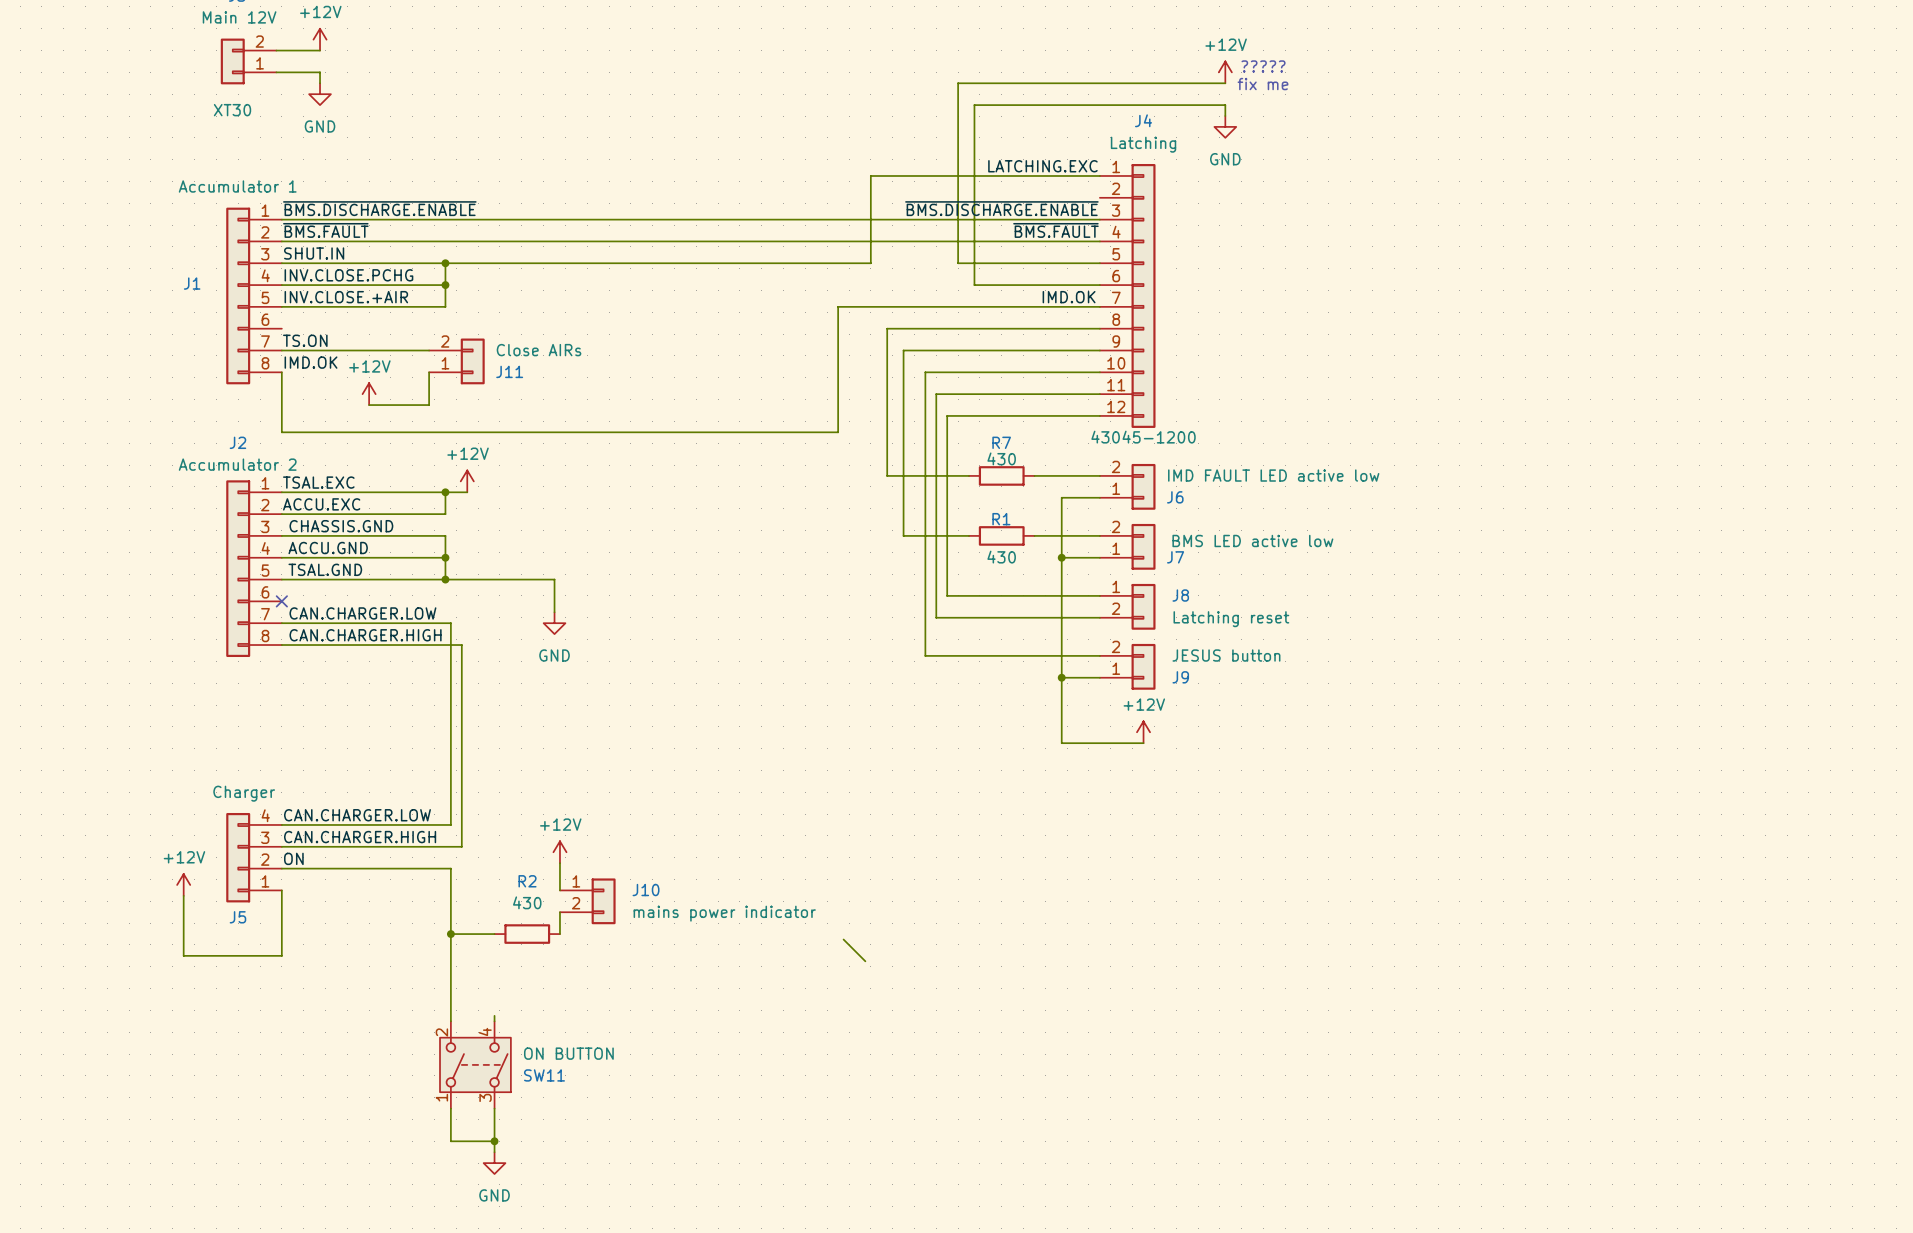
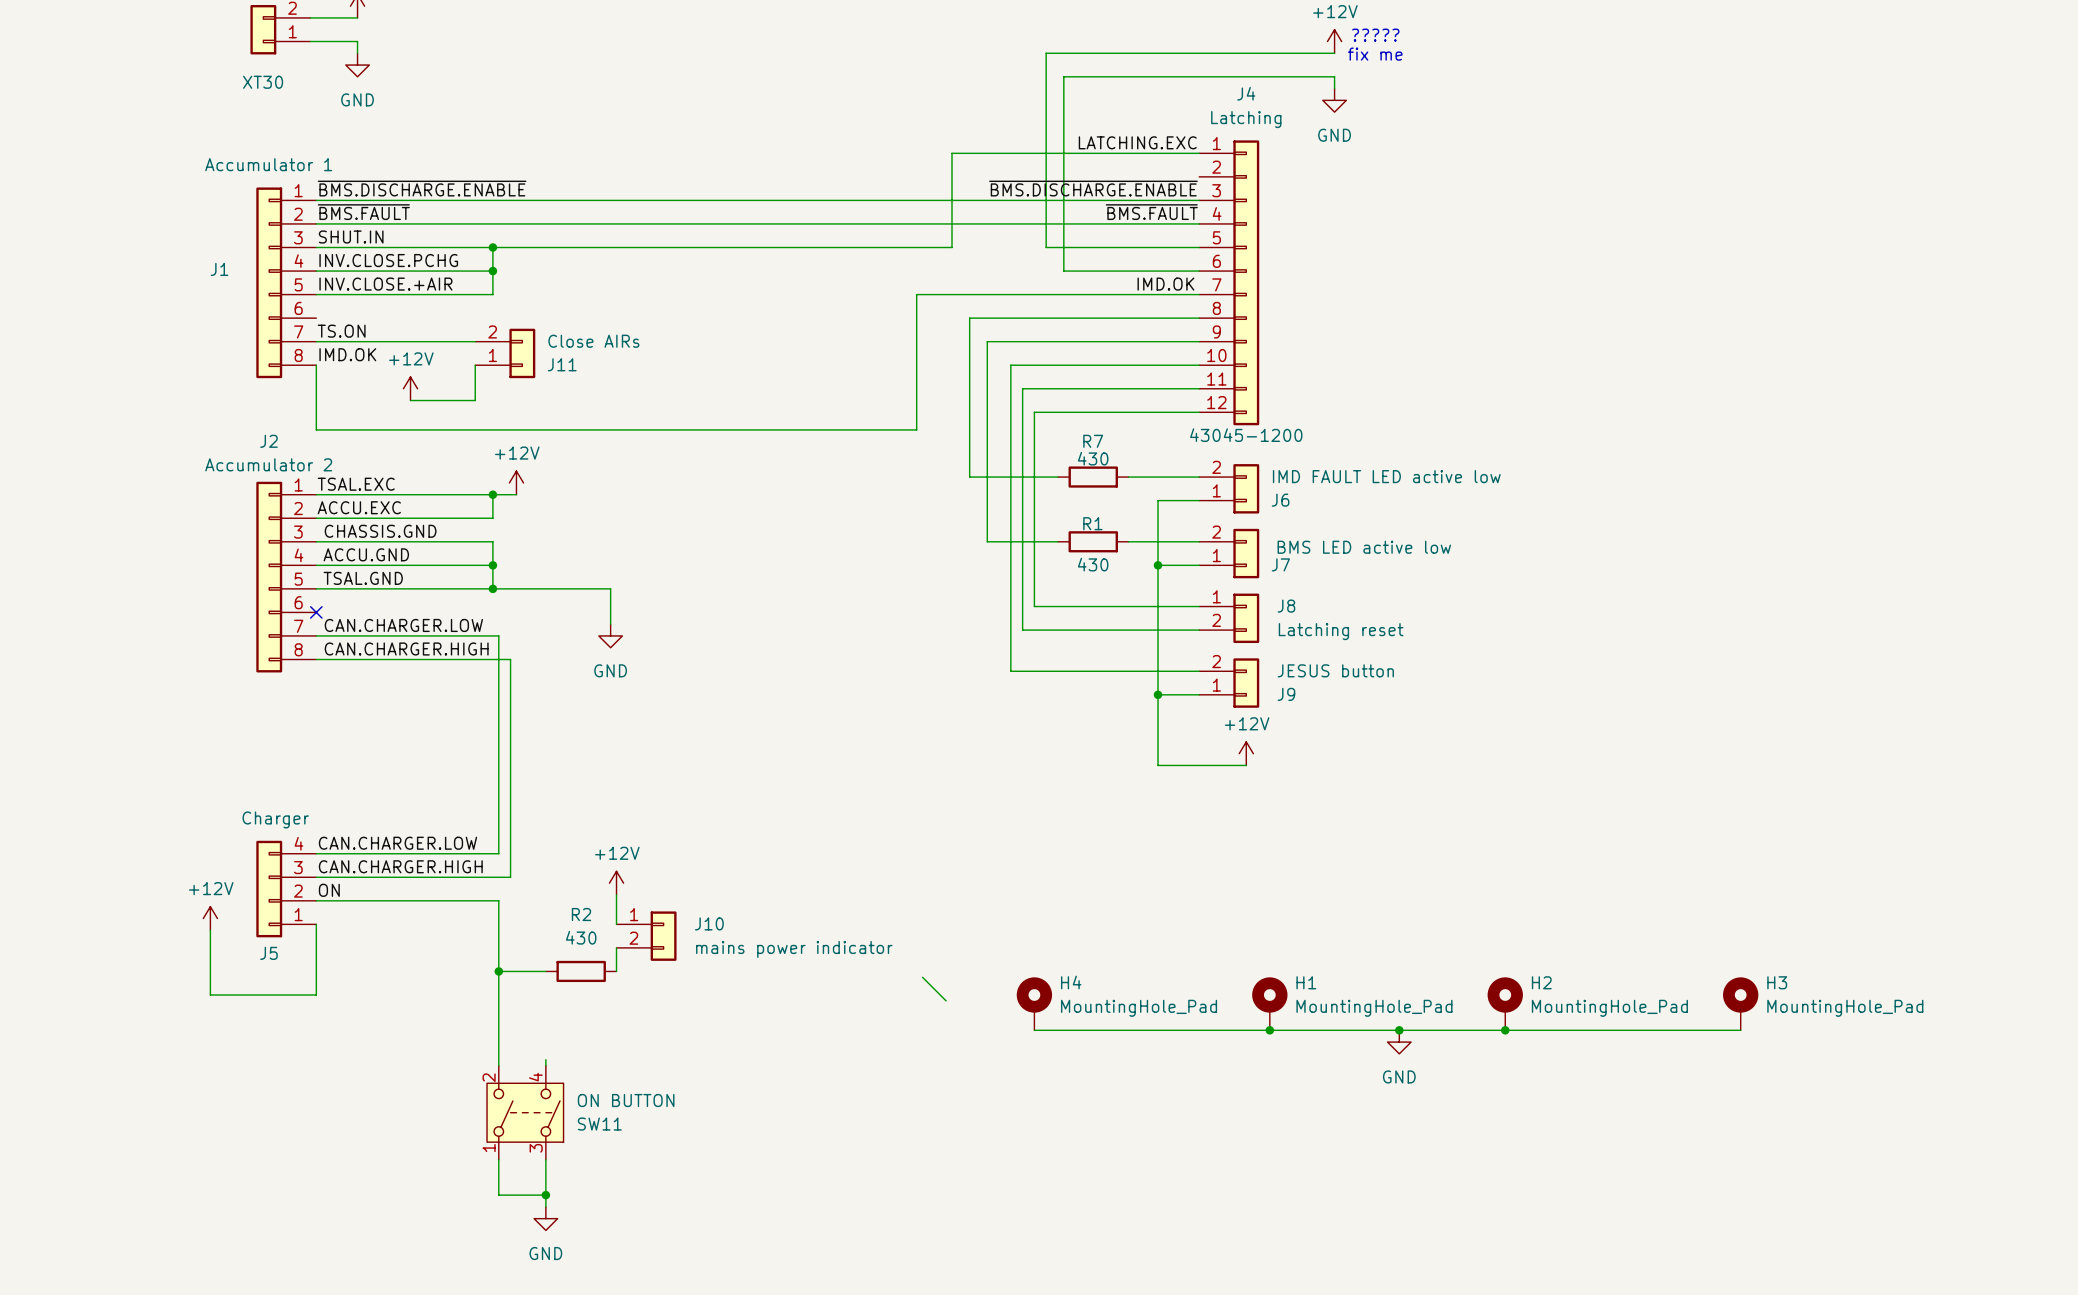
H4: none -> MountingHole_Pad (1034, 1003)
H1: none -> MountingHole_Pad (1269, 1003)
H2: none -> MountingHole_Pad (1505, 1003)
H3: none -> MountingHole_Pad (1740, 1003)
wire: none -> (1034, 1030) (1740, 1030)
junction: none -> (1269, 1030)
junction: none -> (1399, 1030)
junction: none -> (1505, 1030)
power symbol: none -> GND (1399, 1042)

